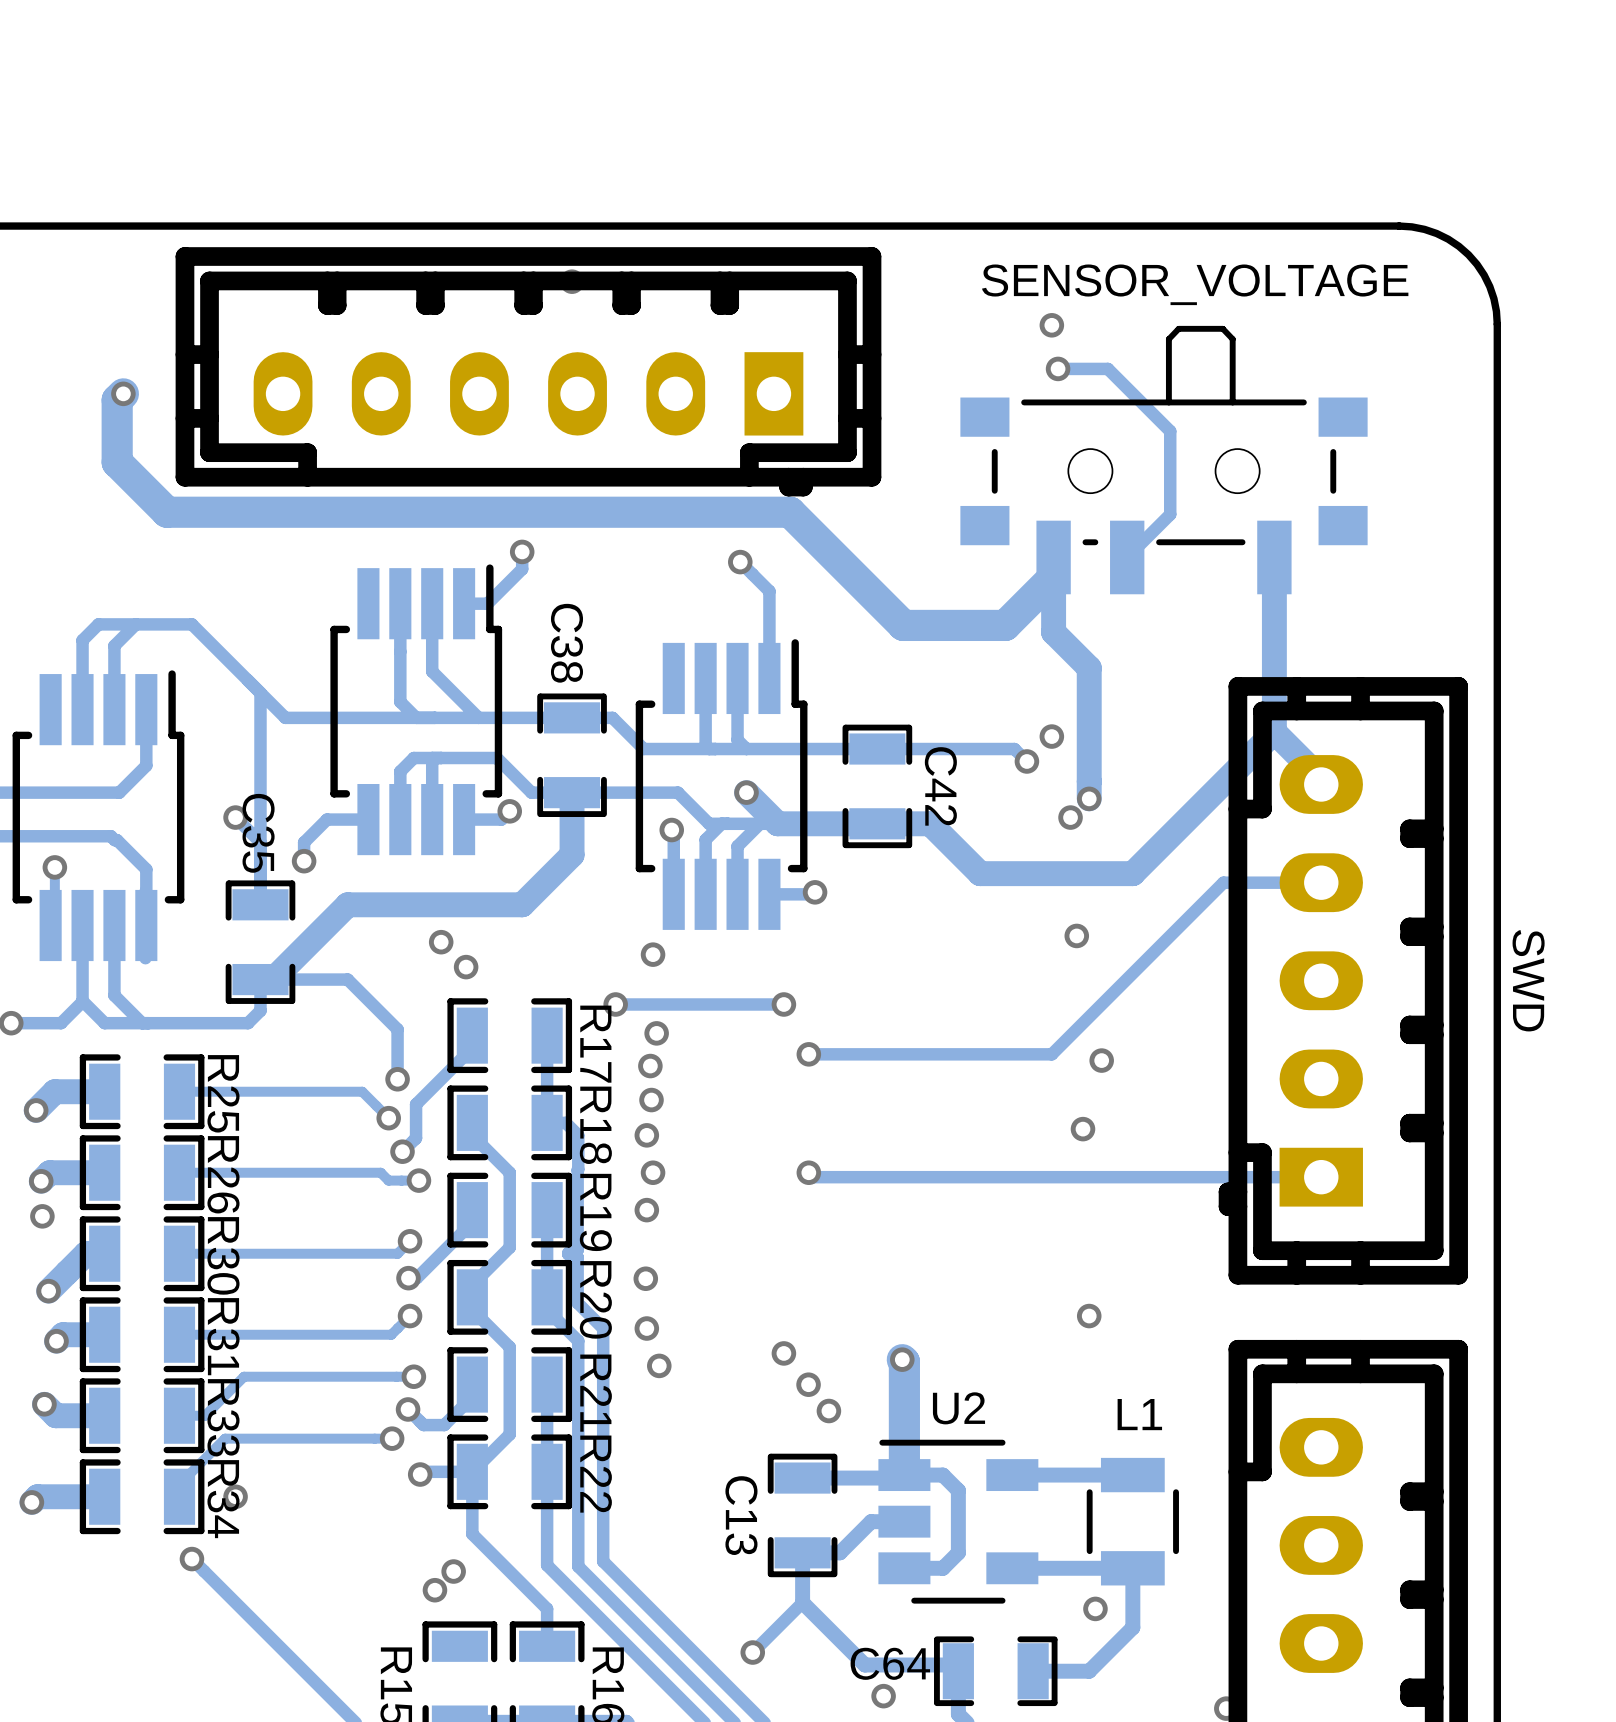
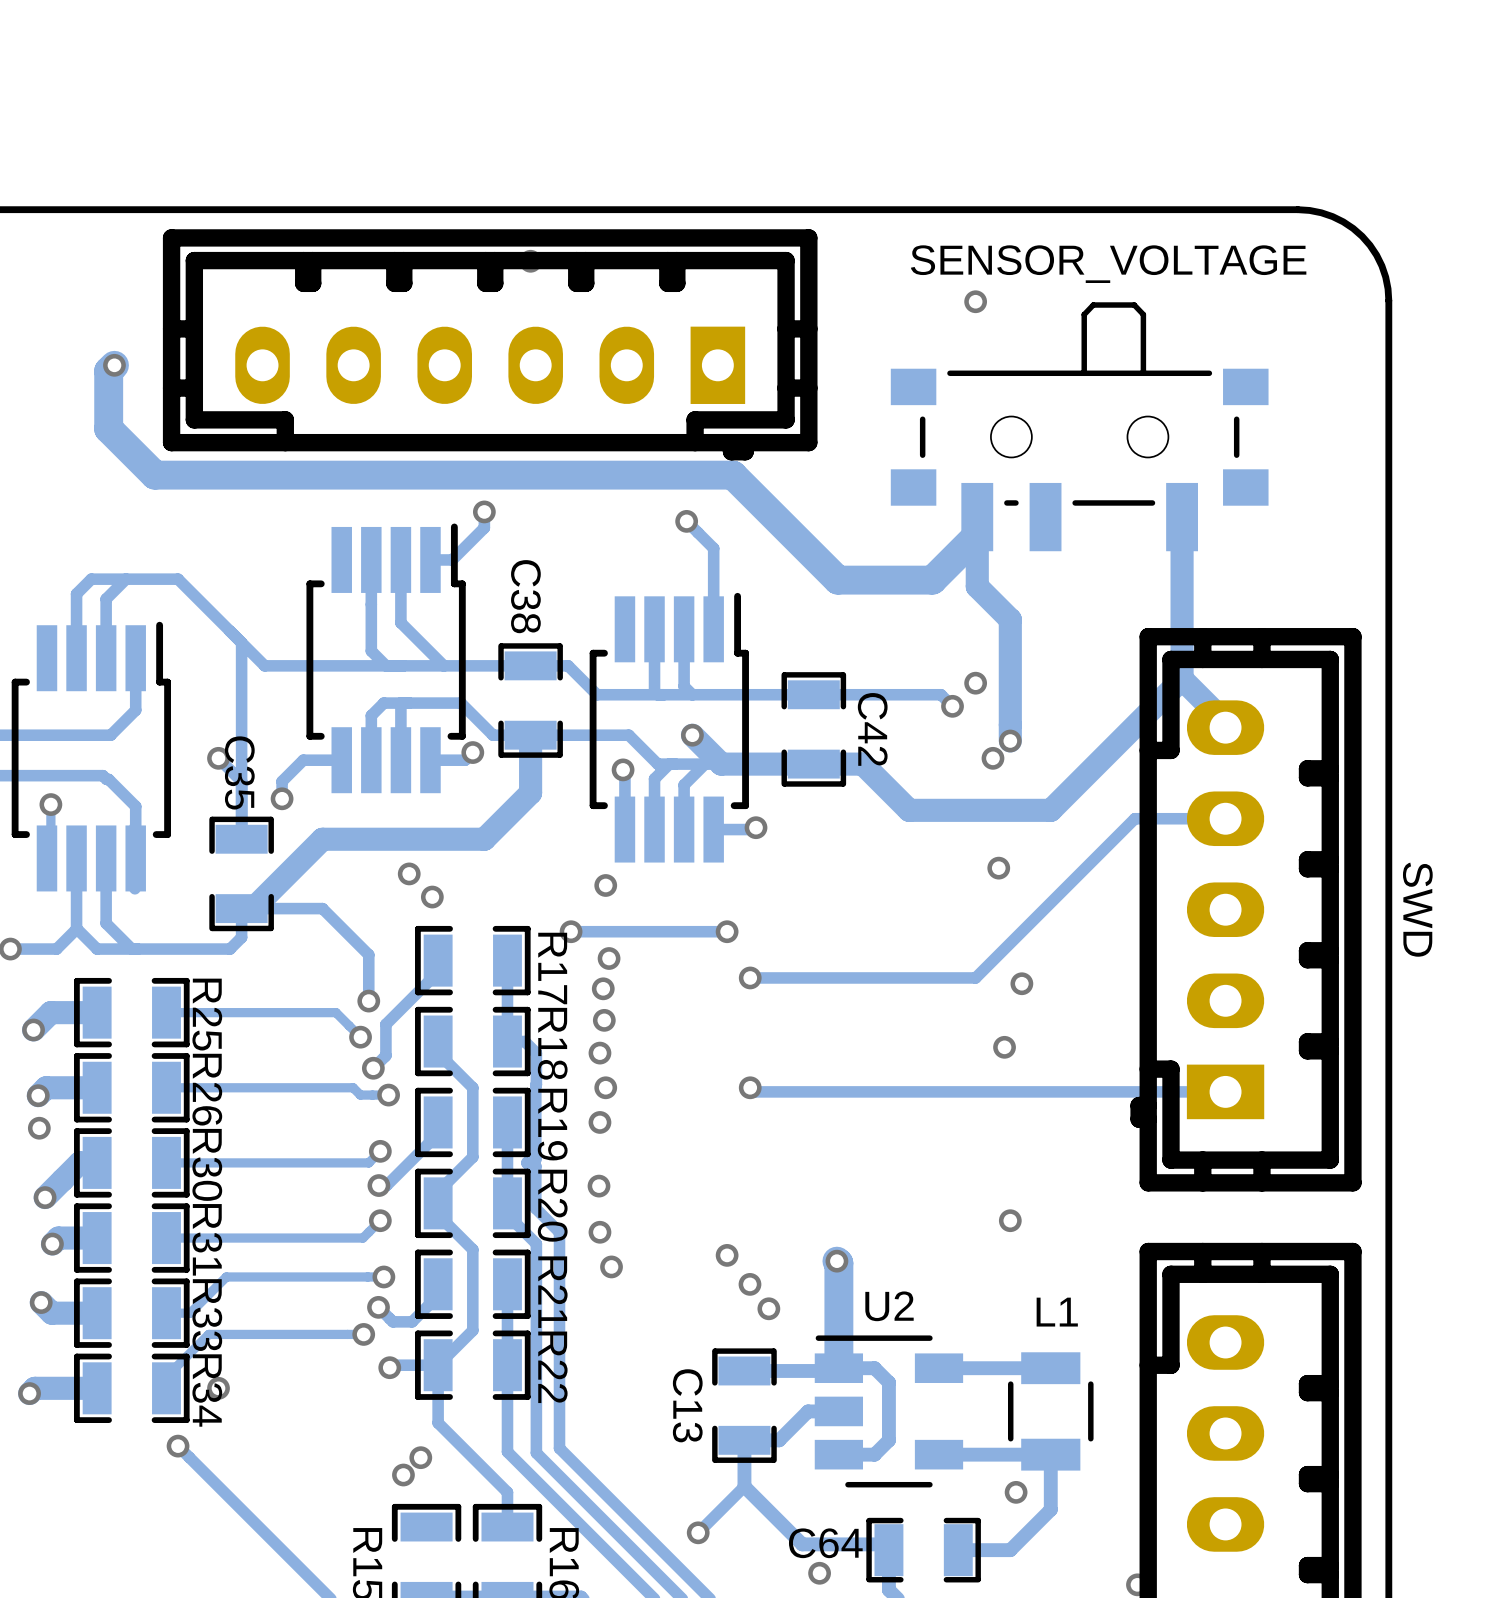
track: (1058, 368) (1107, 368) (1170, 431) (1170, 514) (1127, 557) -> none
via: (1058, 368) -> none

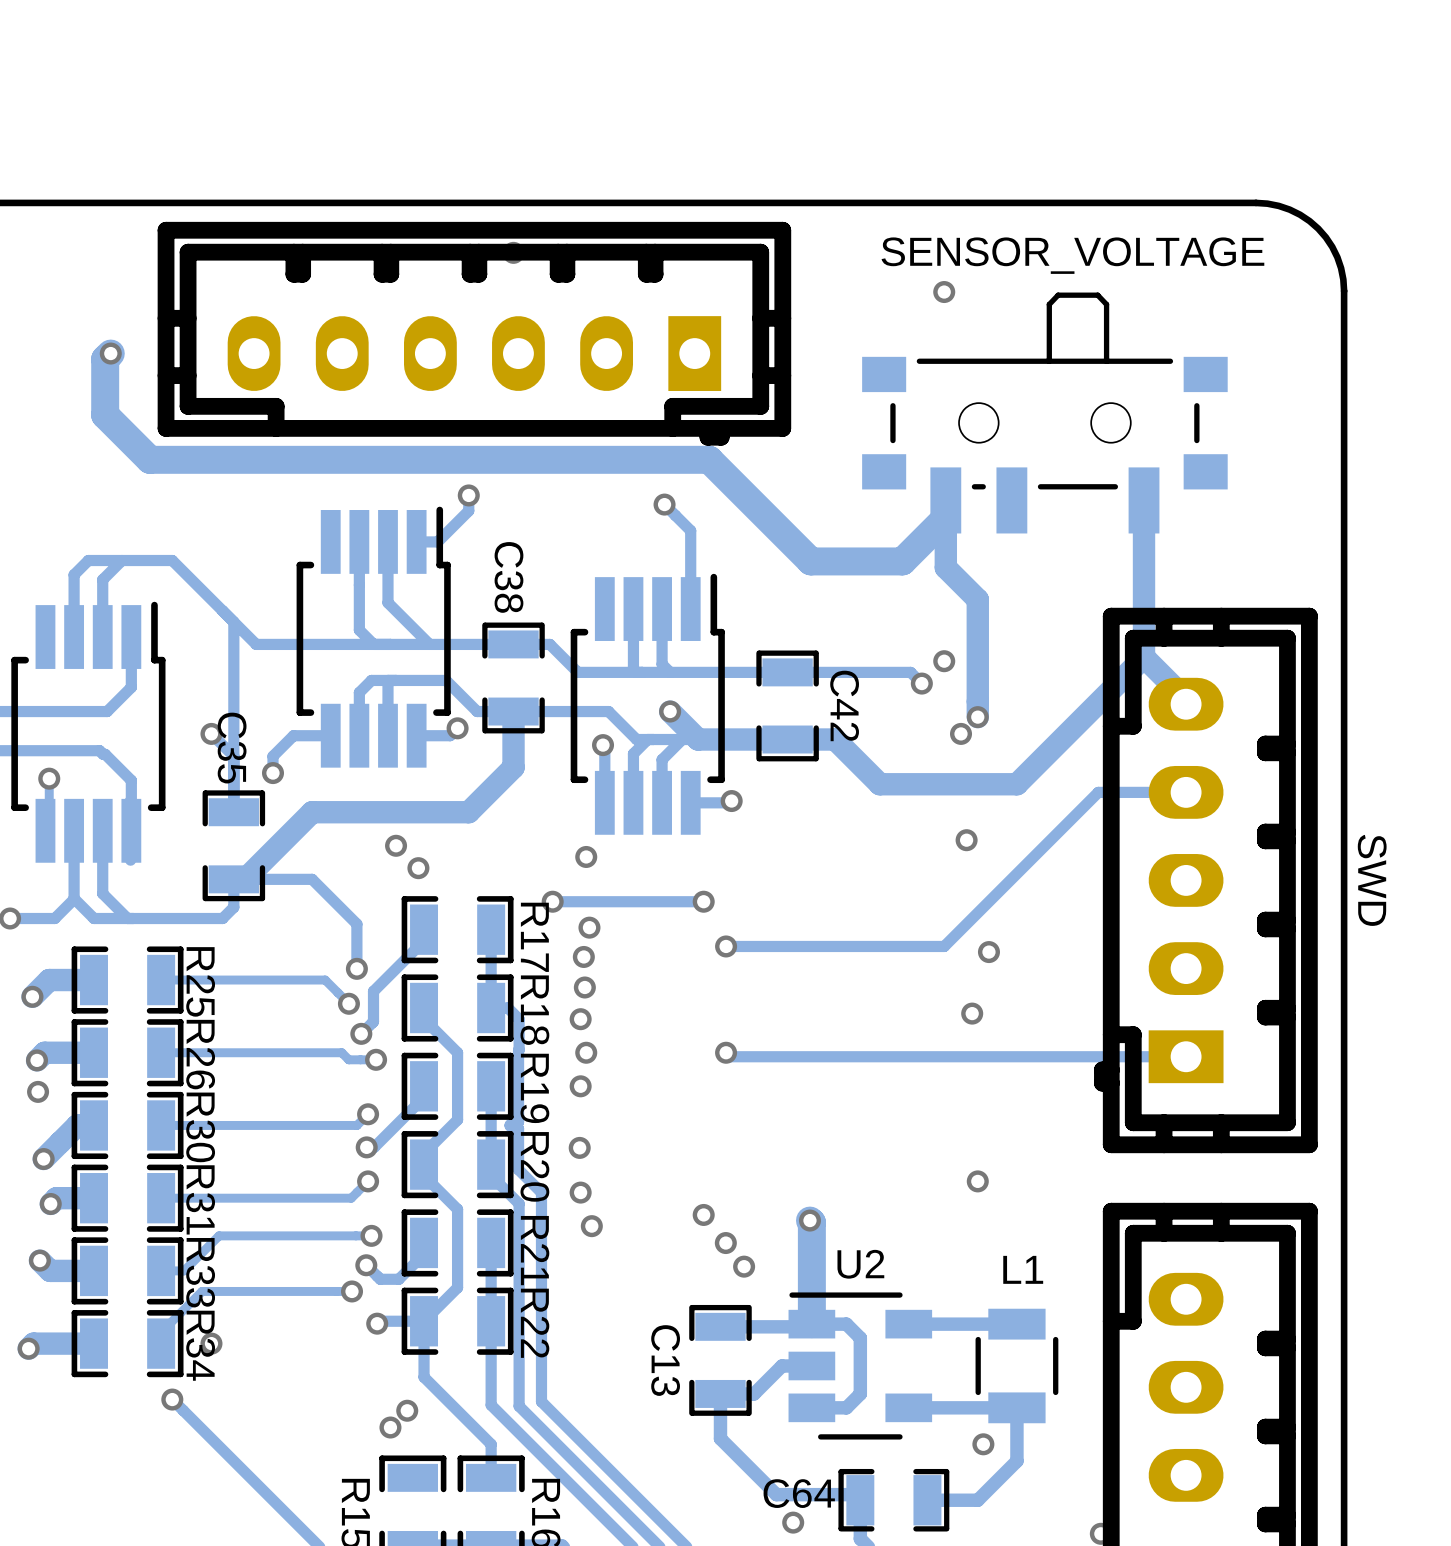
track: (744, 1486) (698, 1532) -> none
via: (698, 1532) -> none

